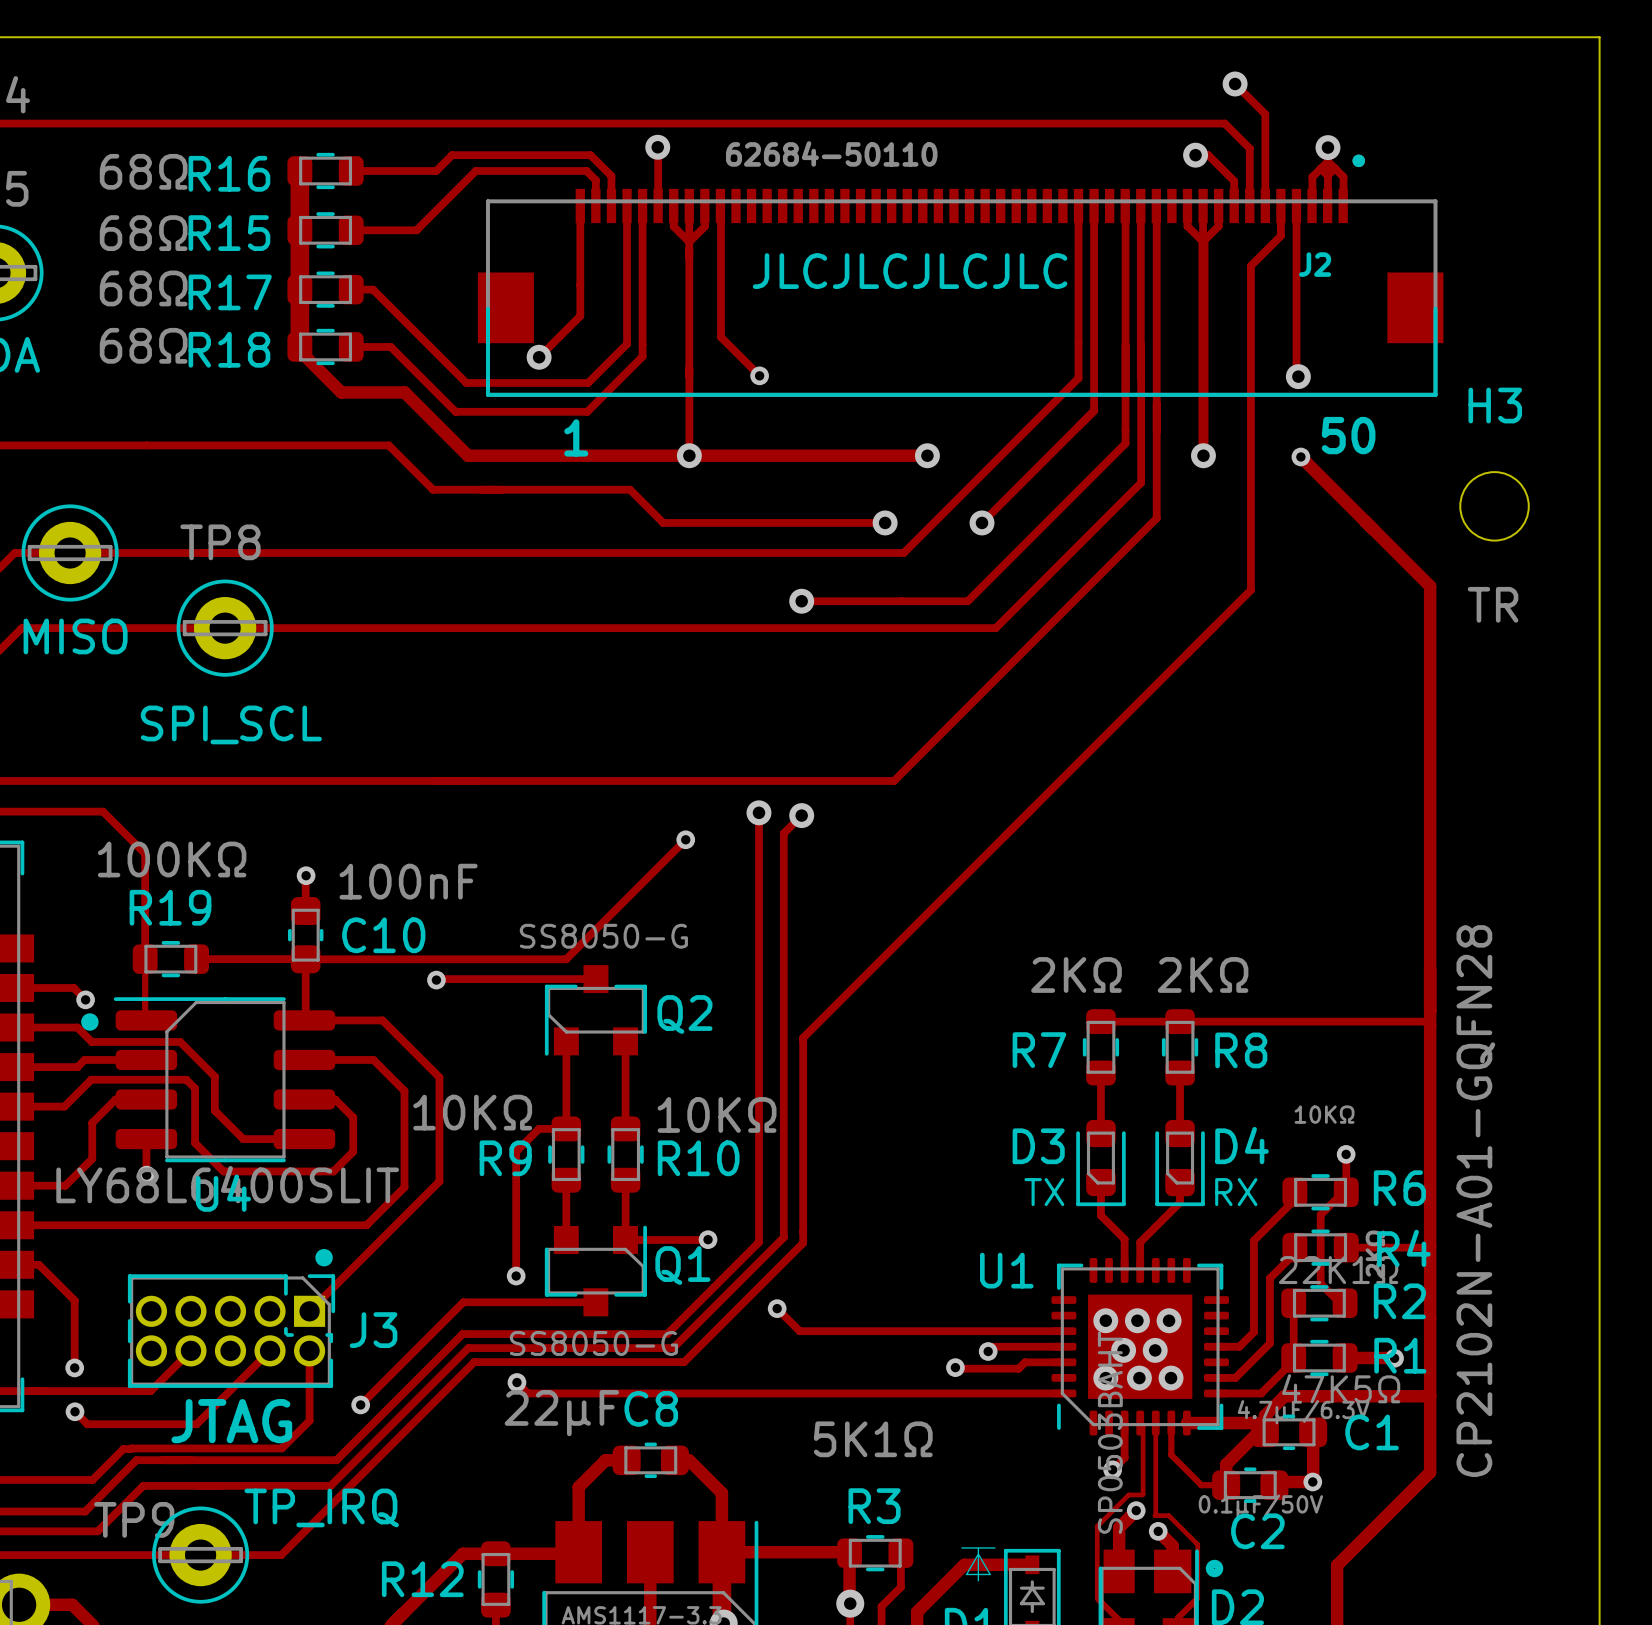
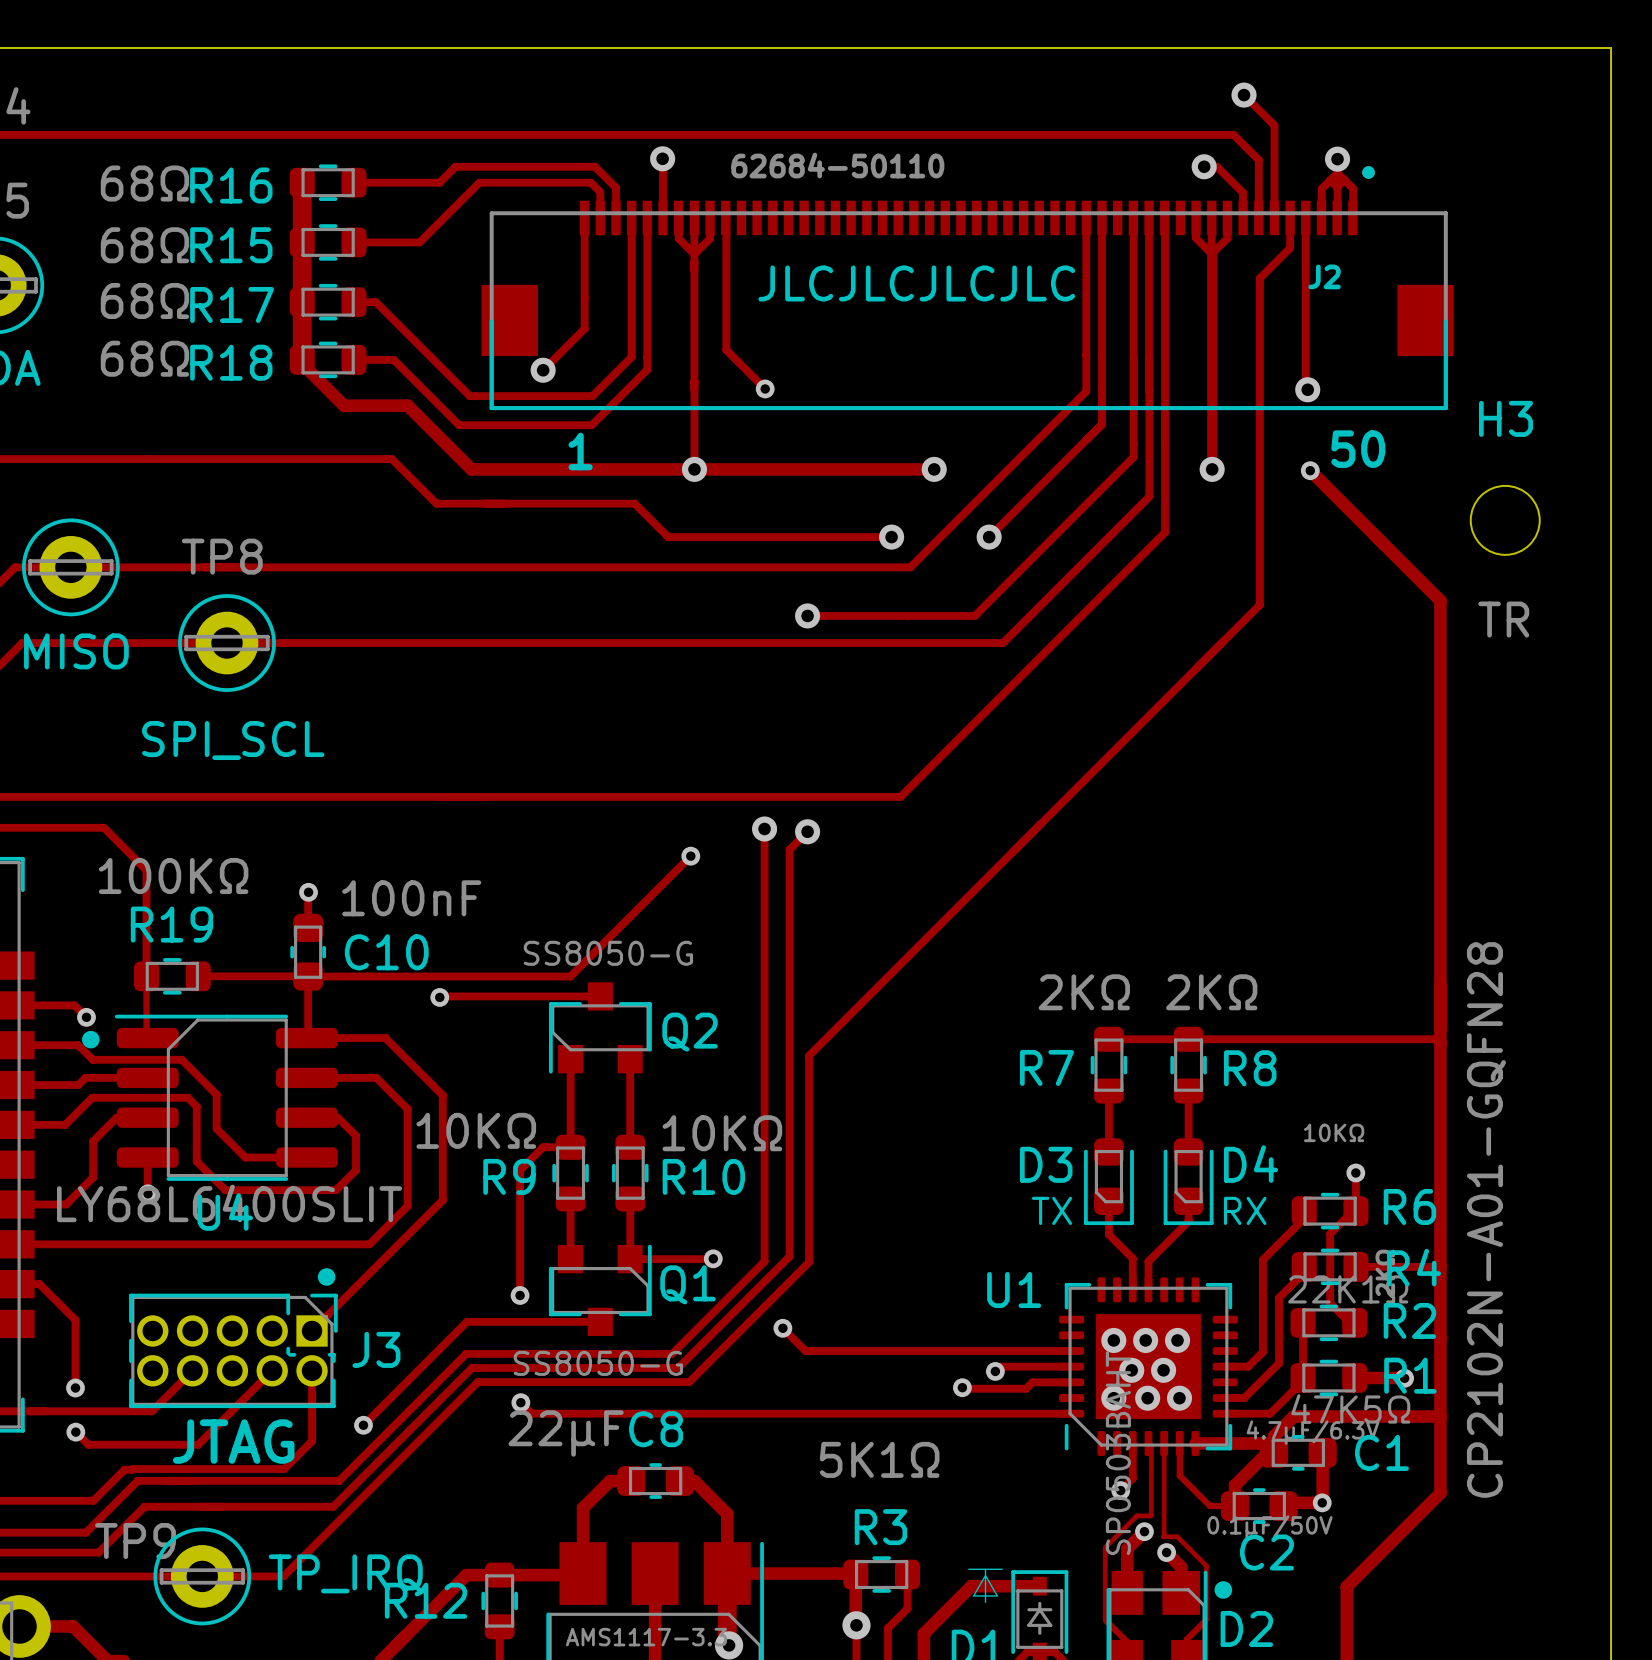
TP9 value position: TP_IRQ (321, 1507) -> TP_IRQ (346, 1573)

